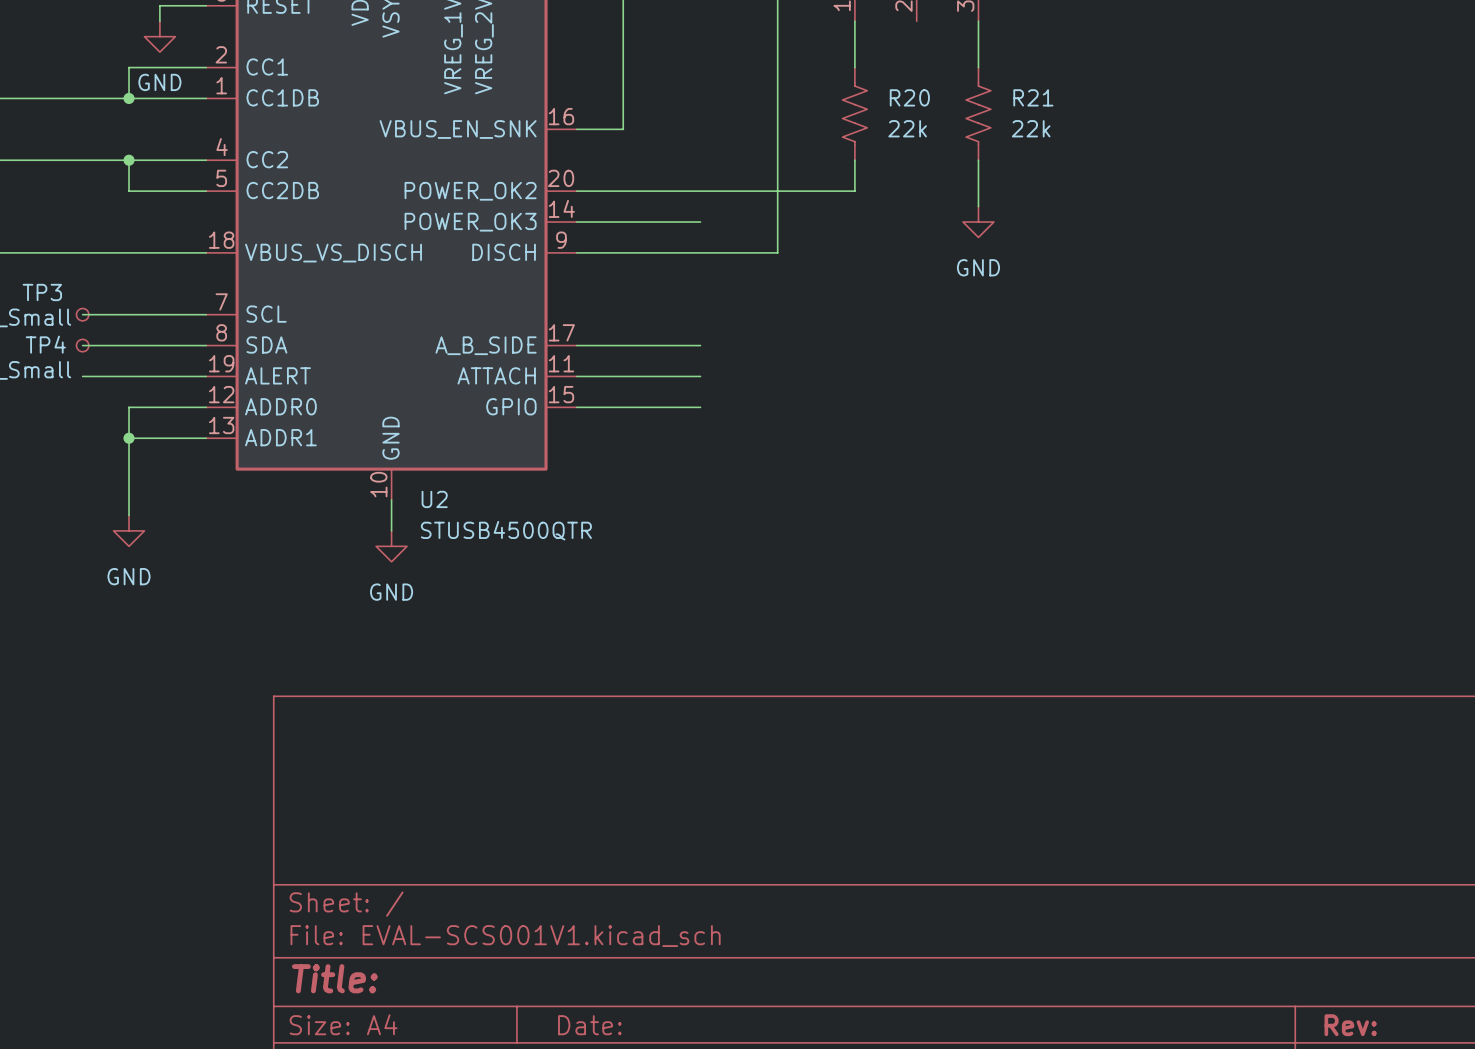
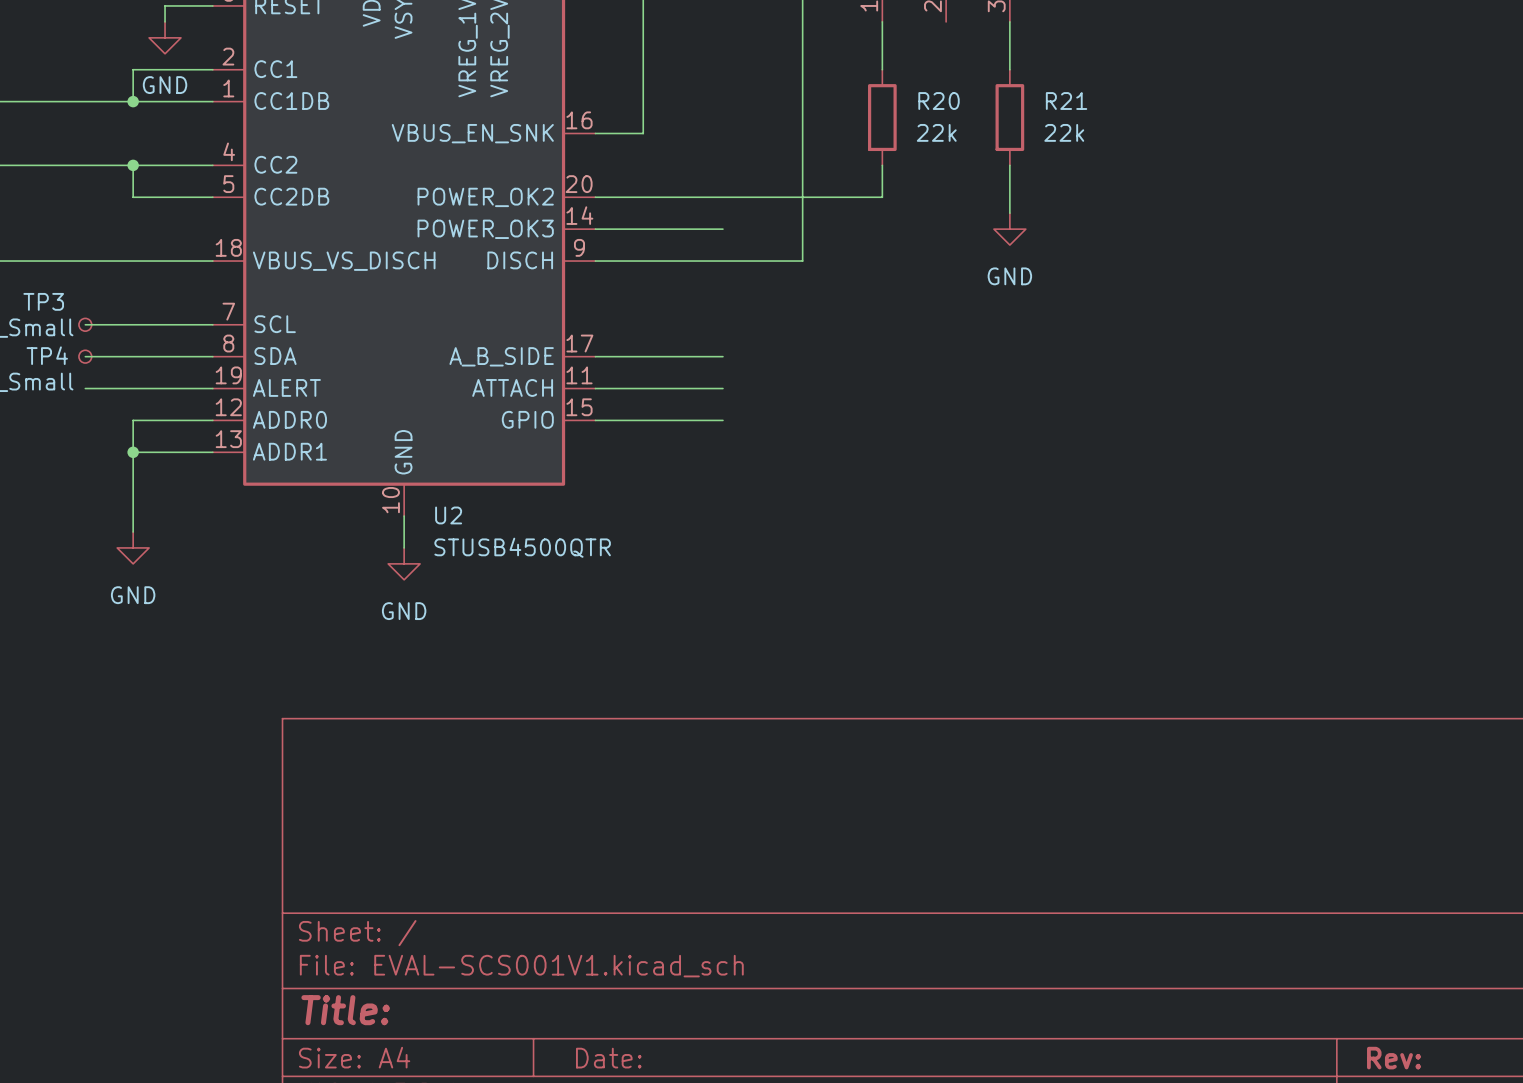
R20 symbol: [842, 67, 868, 161] -> [868, 69, 897, 166]
R21 symbol: [966, 67, 991, 161] -> [995, 69, 1025, 166]

